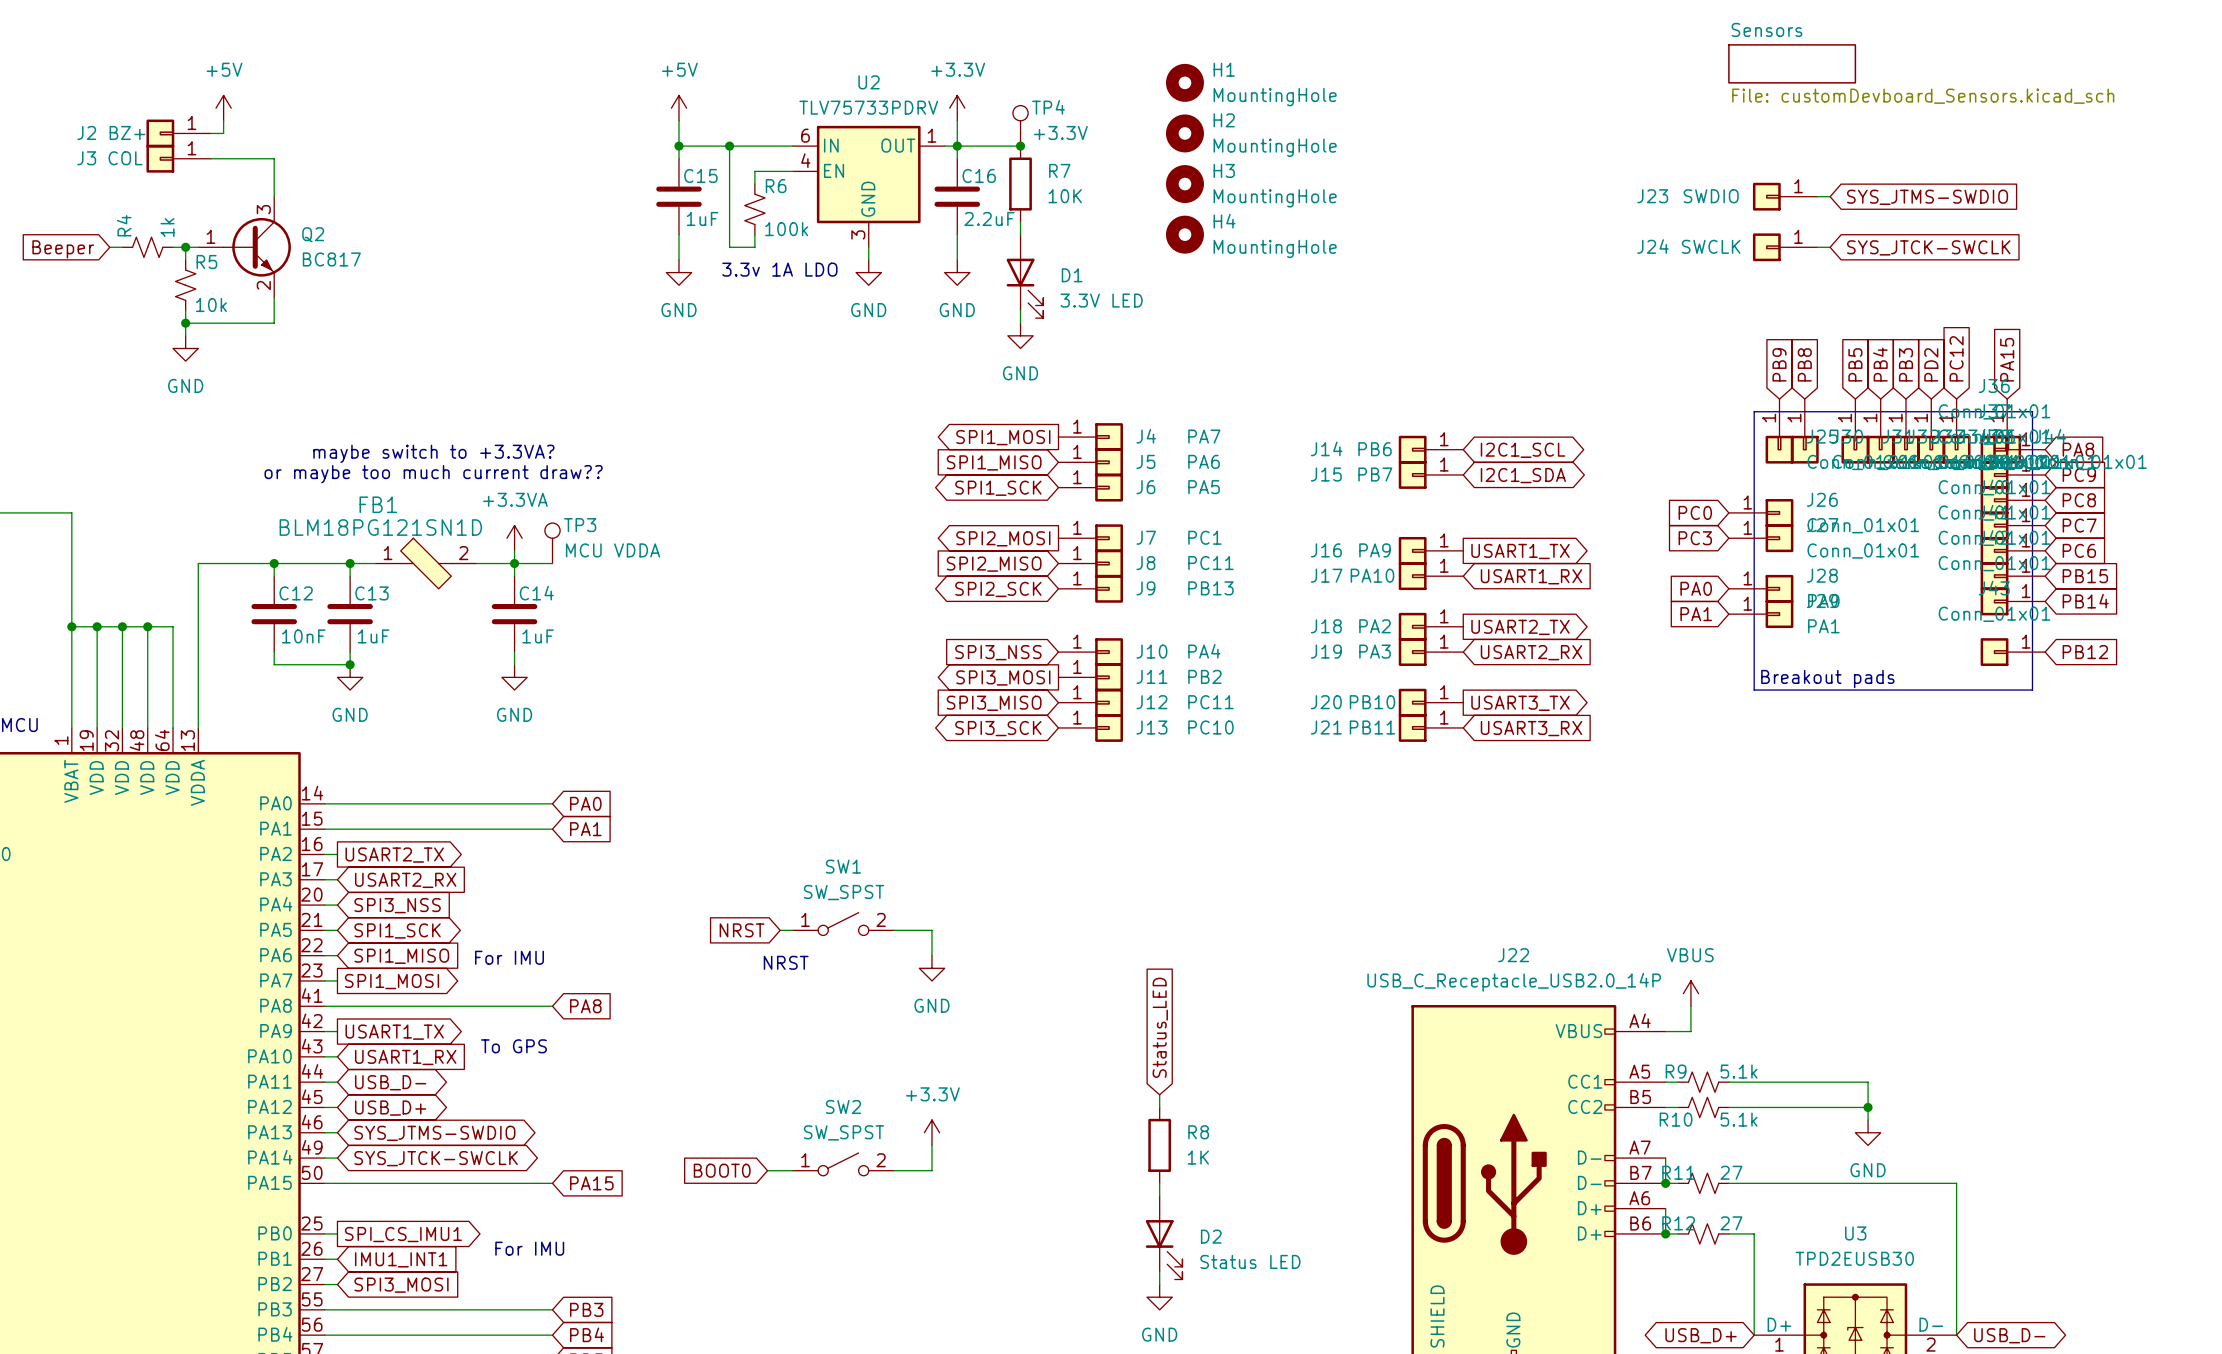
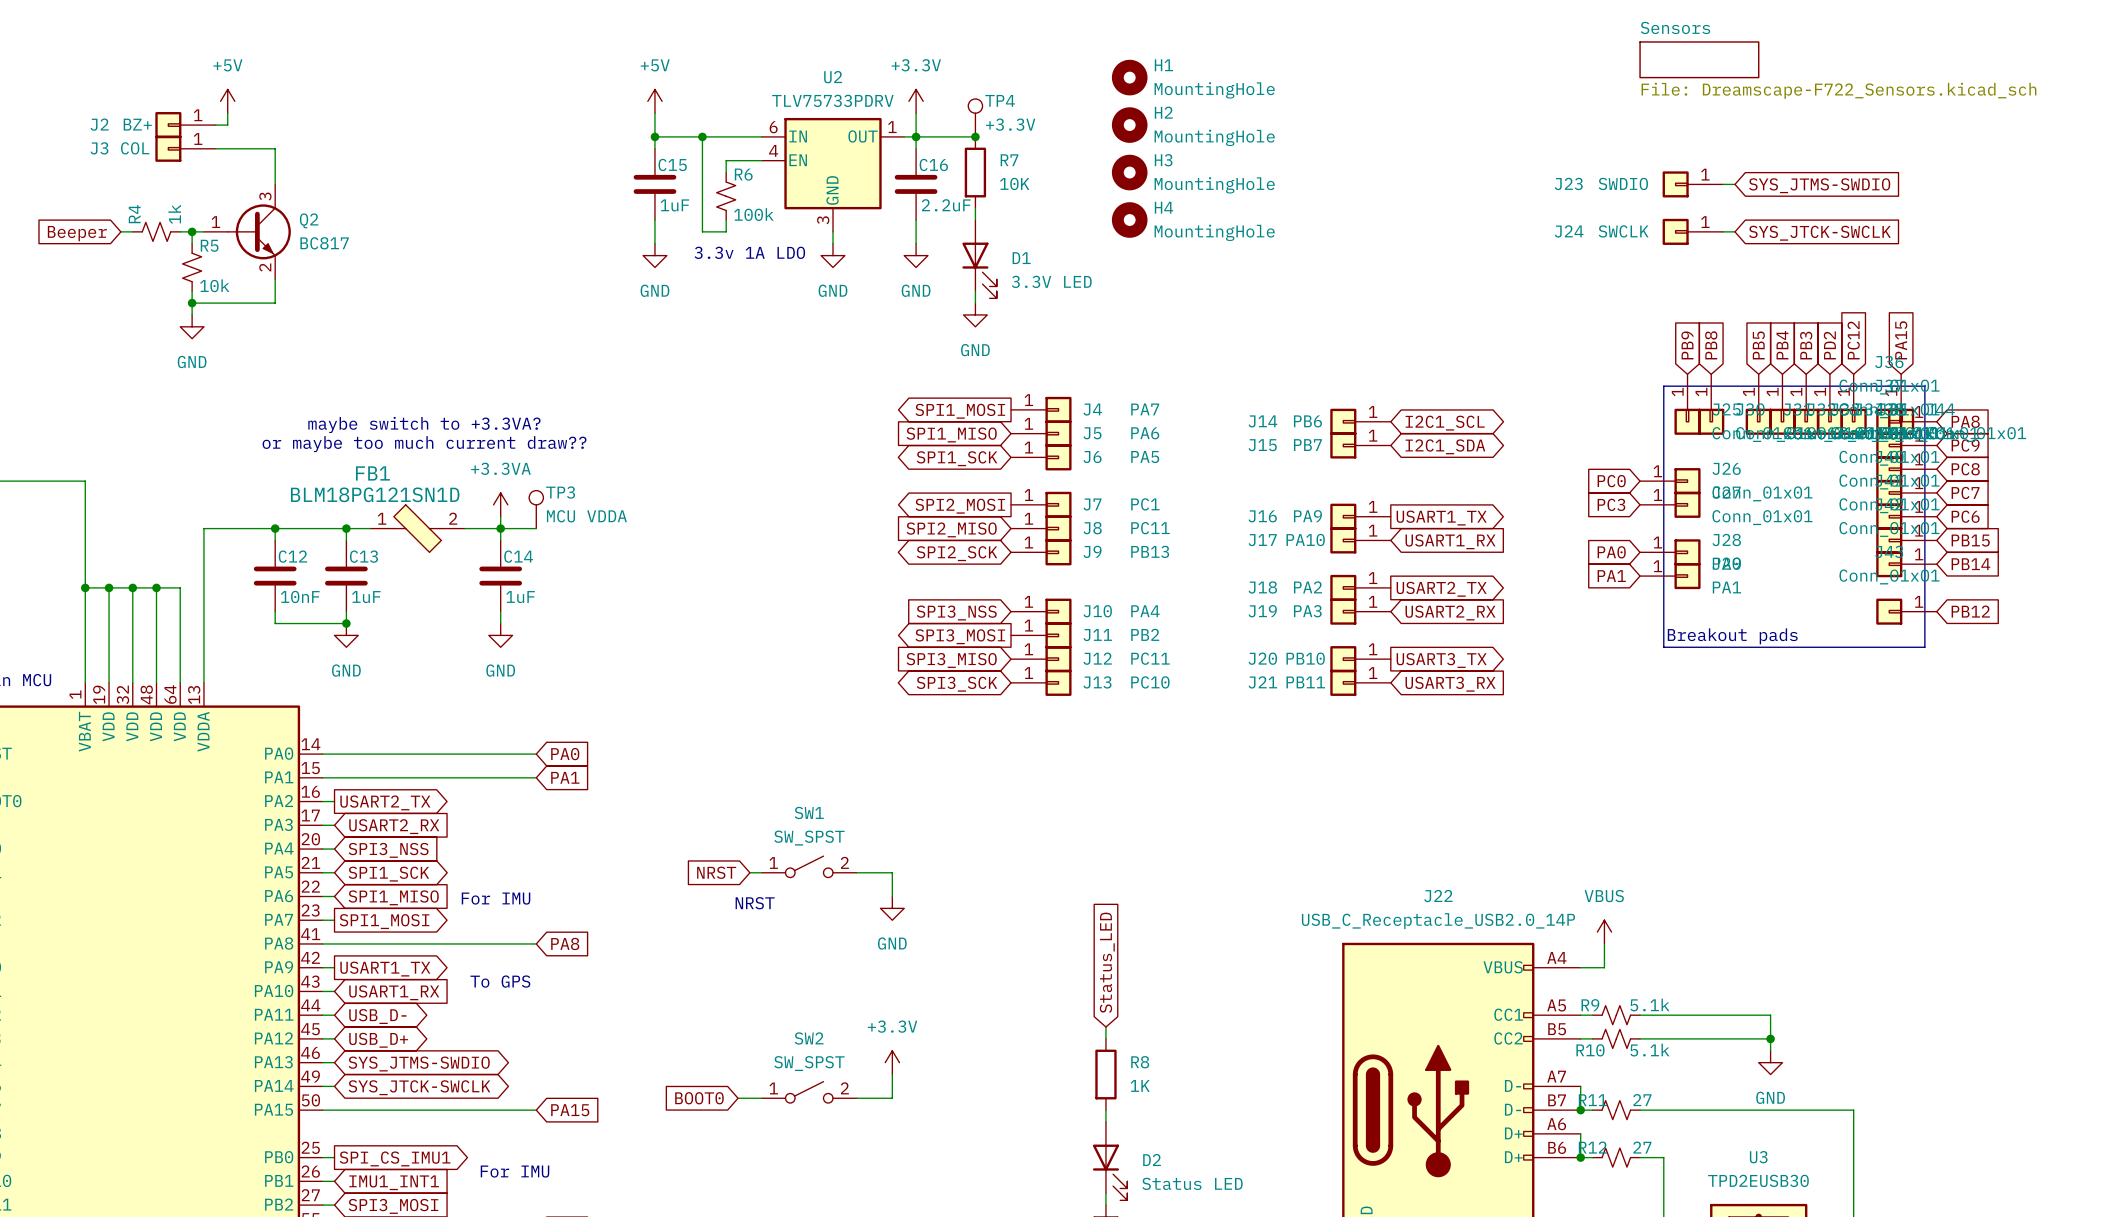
sheet Sensors value: File: customDevboard_Sensors.kicad_sch (1923, 96) -> File: Dreamscape-F722_Sensors.kicad_sch (1838, 90)

